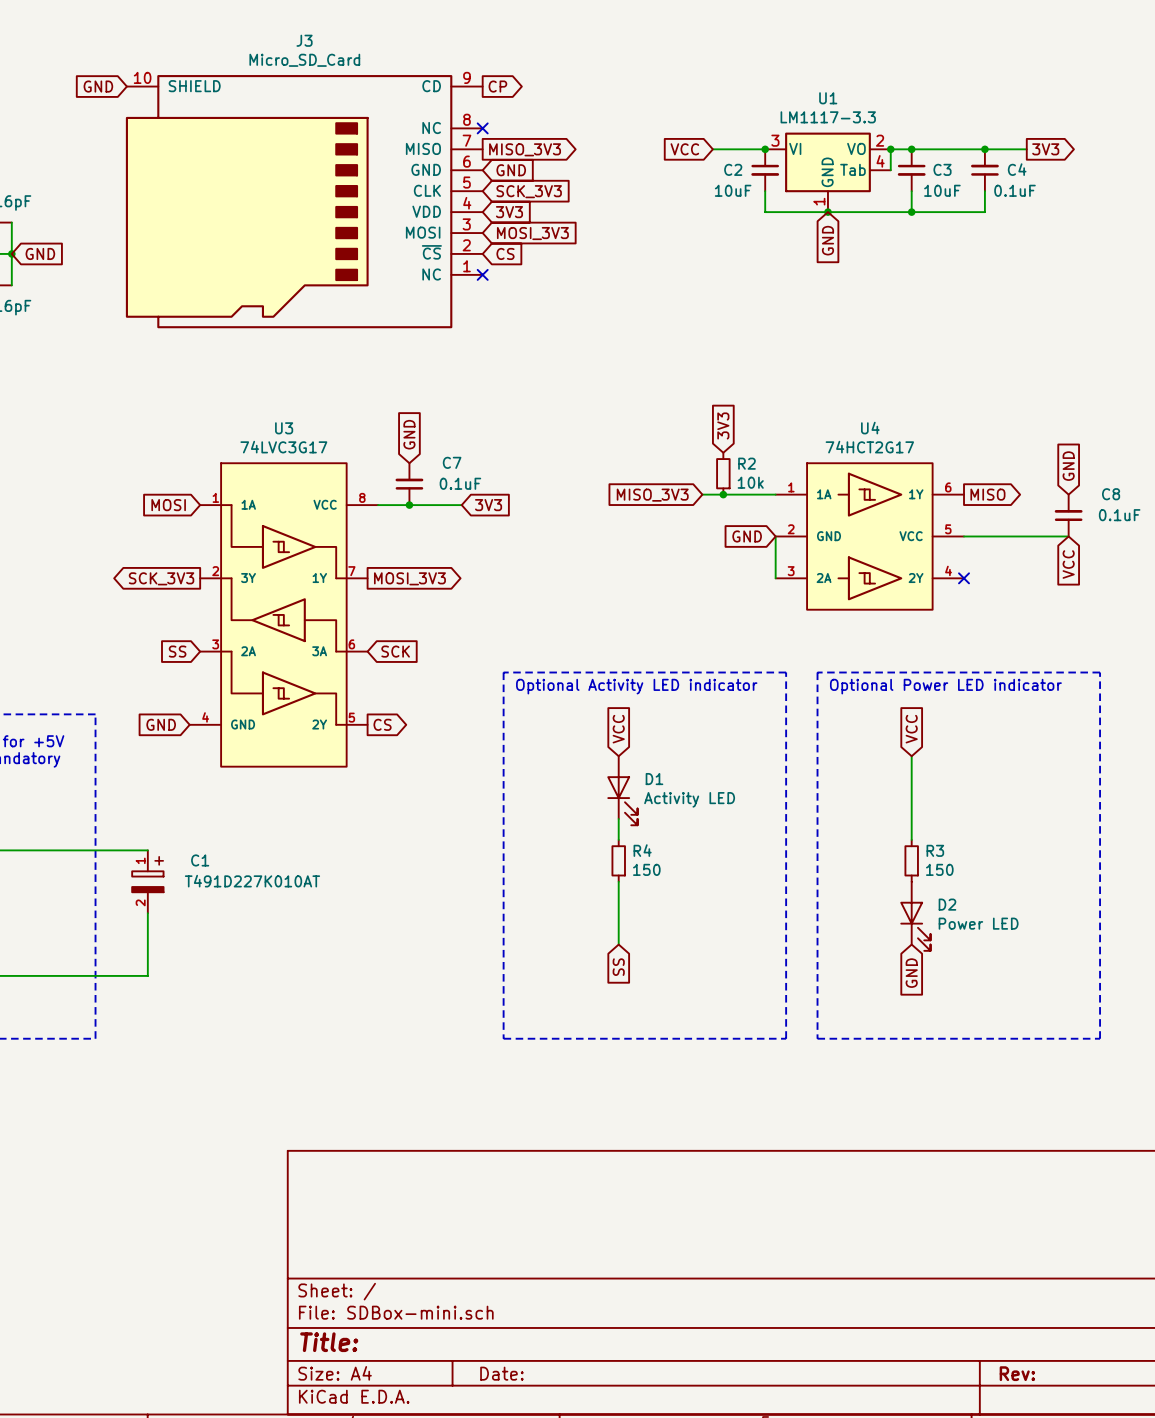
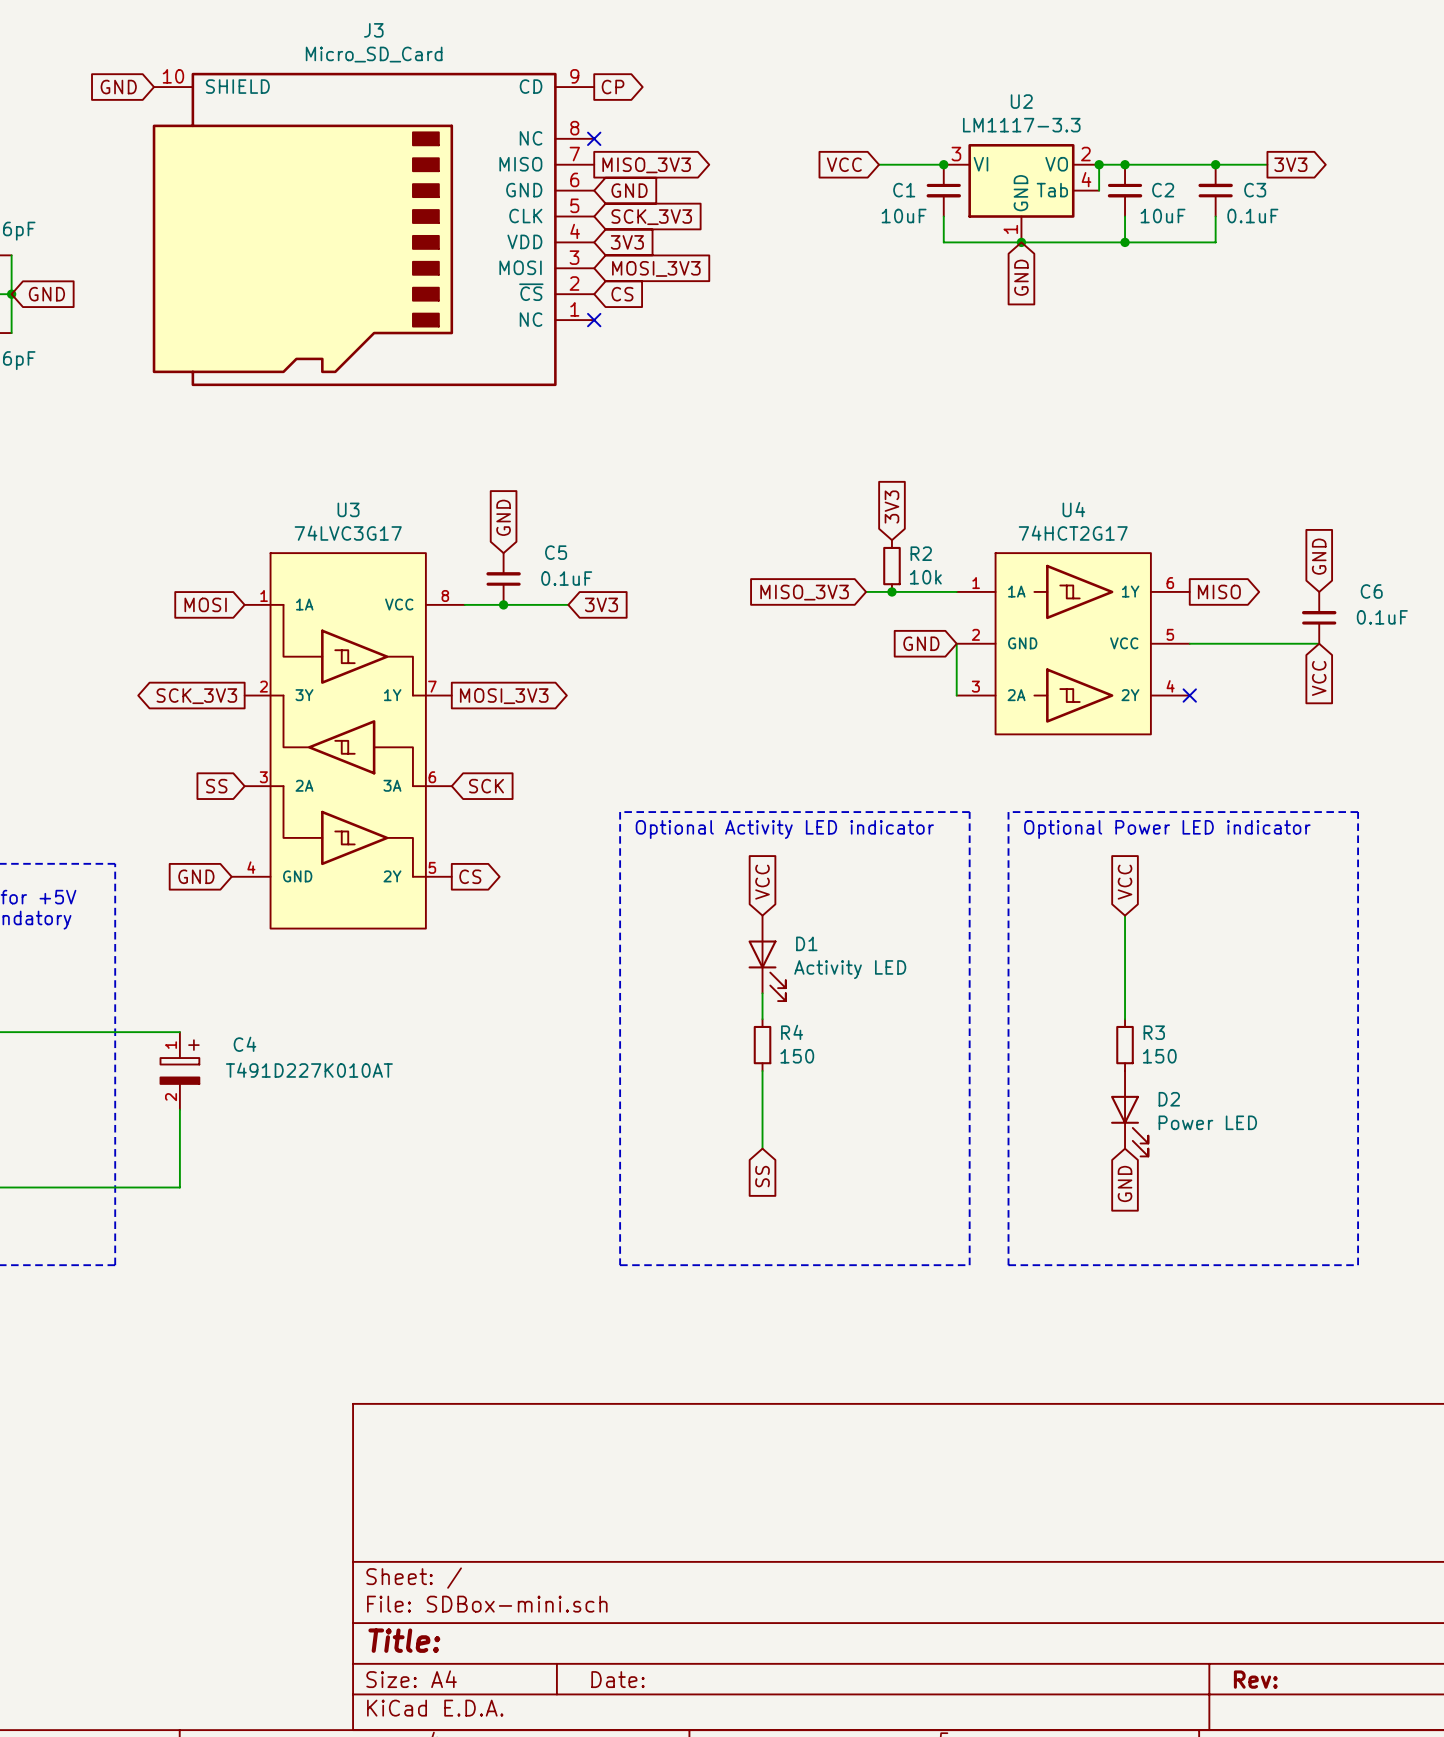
U1 name: U1 (828, 98) -> U2 (1021, 101)
C2 name: C2 (733, 169) -> C1 (904, 190)
C3 name: C3 (942, 169) -> C2 (1163, 190)
C4 name: C4 (1017, 169) -> C3 (1255, 190)
C7 name: C7 (452, 462) -> C5 (556, 552)
C8 name: C8 (1111, 494) -> C6 (1371, 591)
C1 name: C1 (200, 860) -> C4 (244, 1044)

